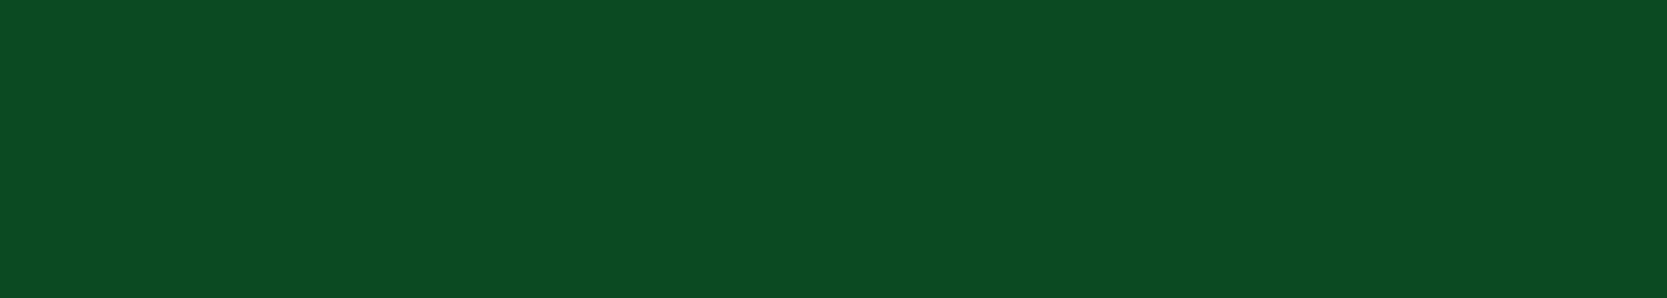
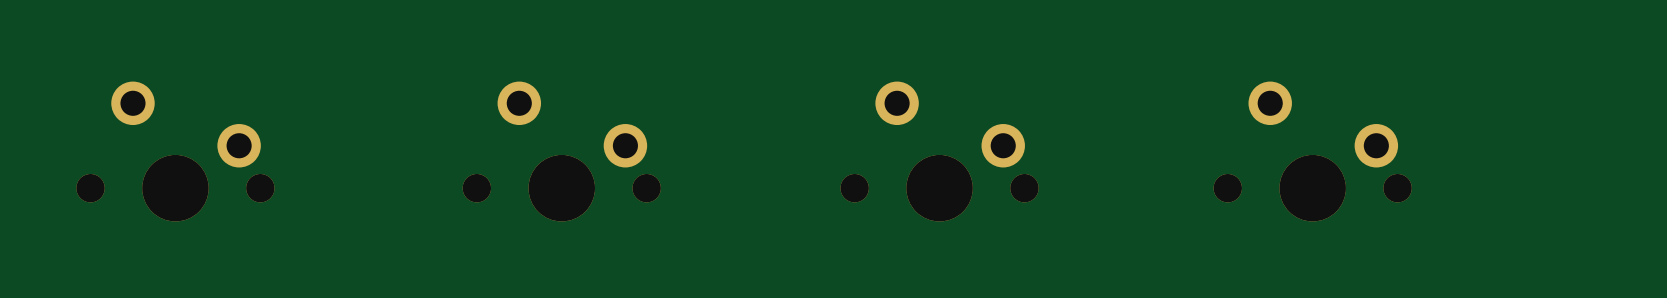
part: none -> (175, 151)
part: none -> (561, 151)
part: none -> (939, 151)
part: none -> (1312, 151)

